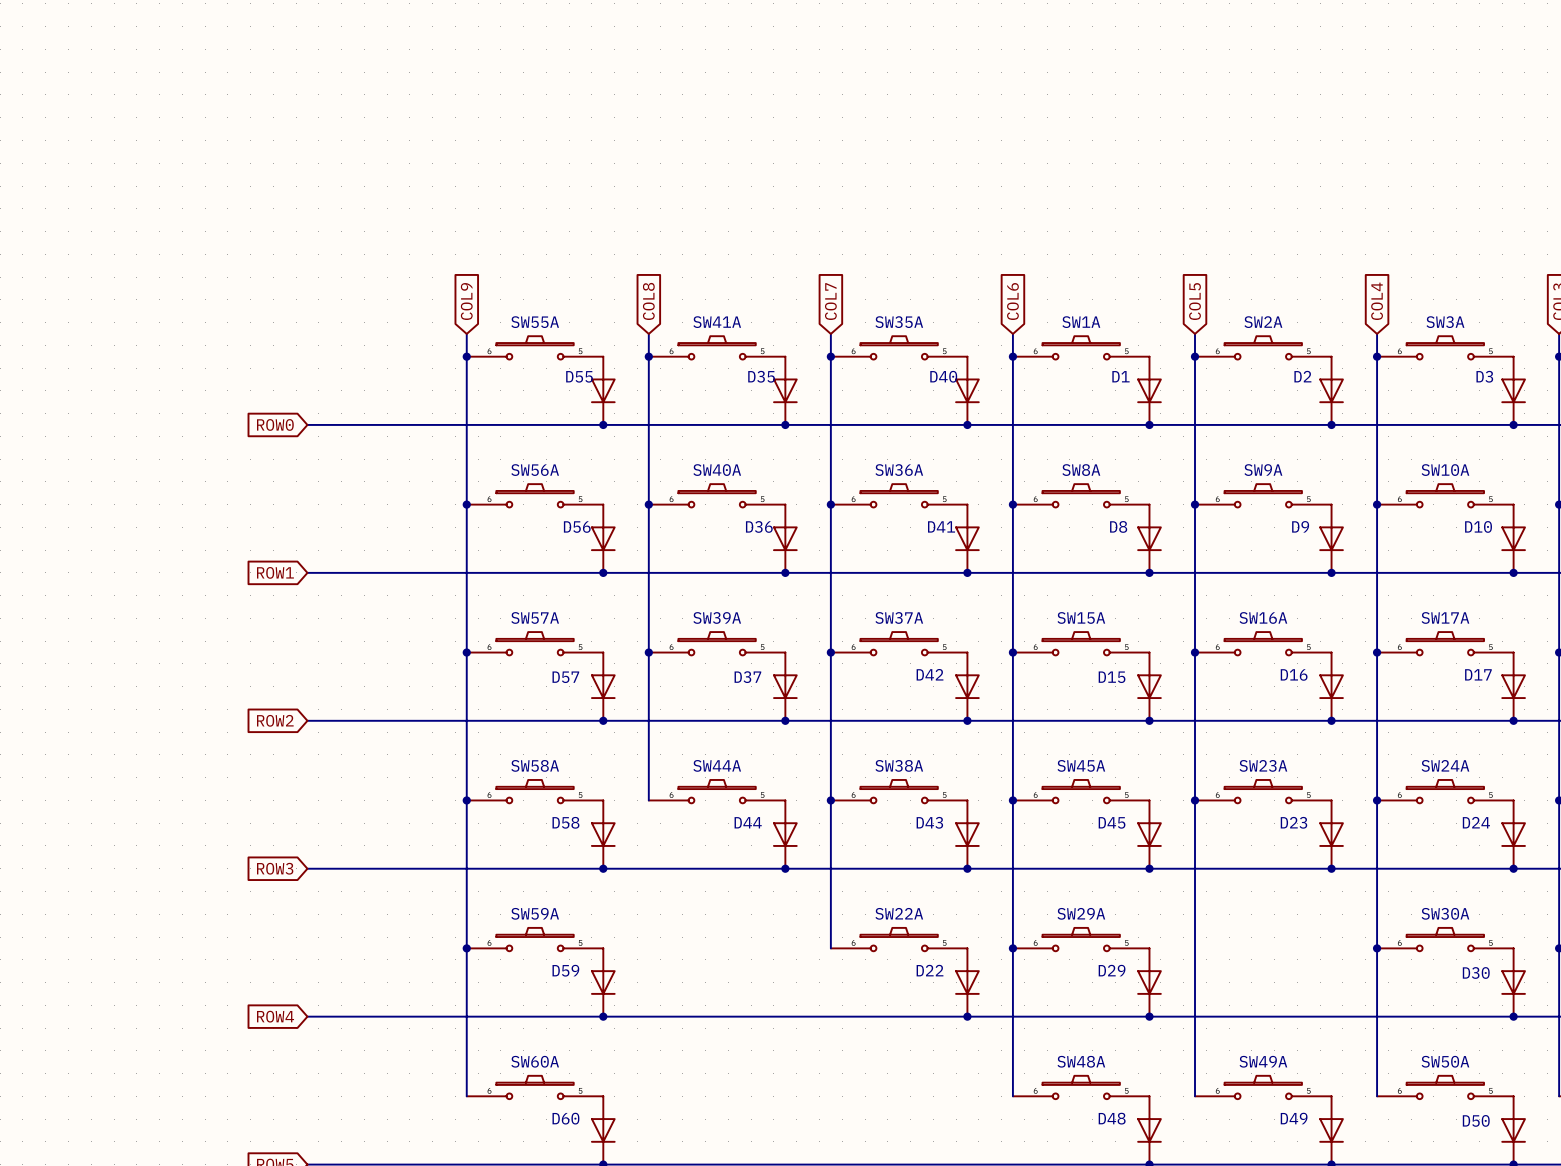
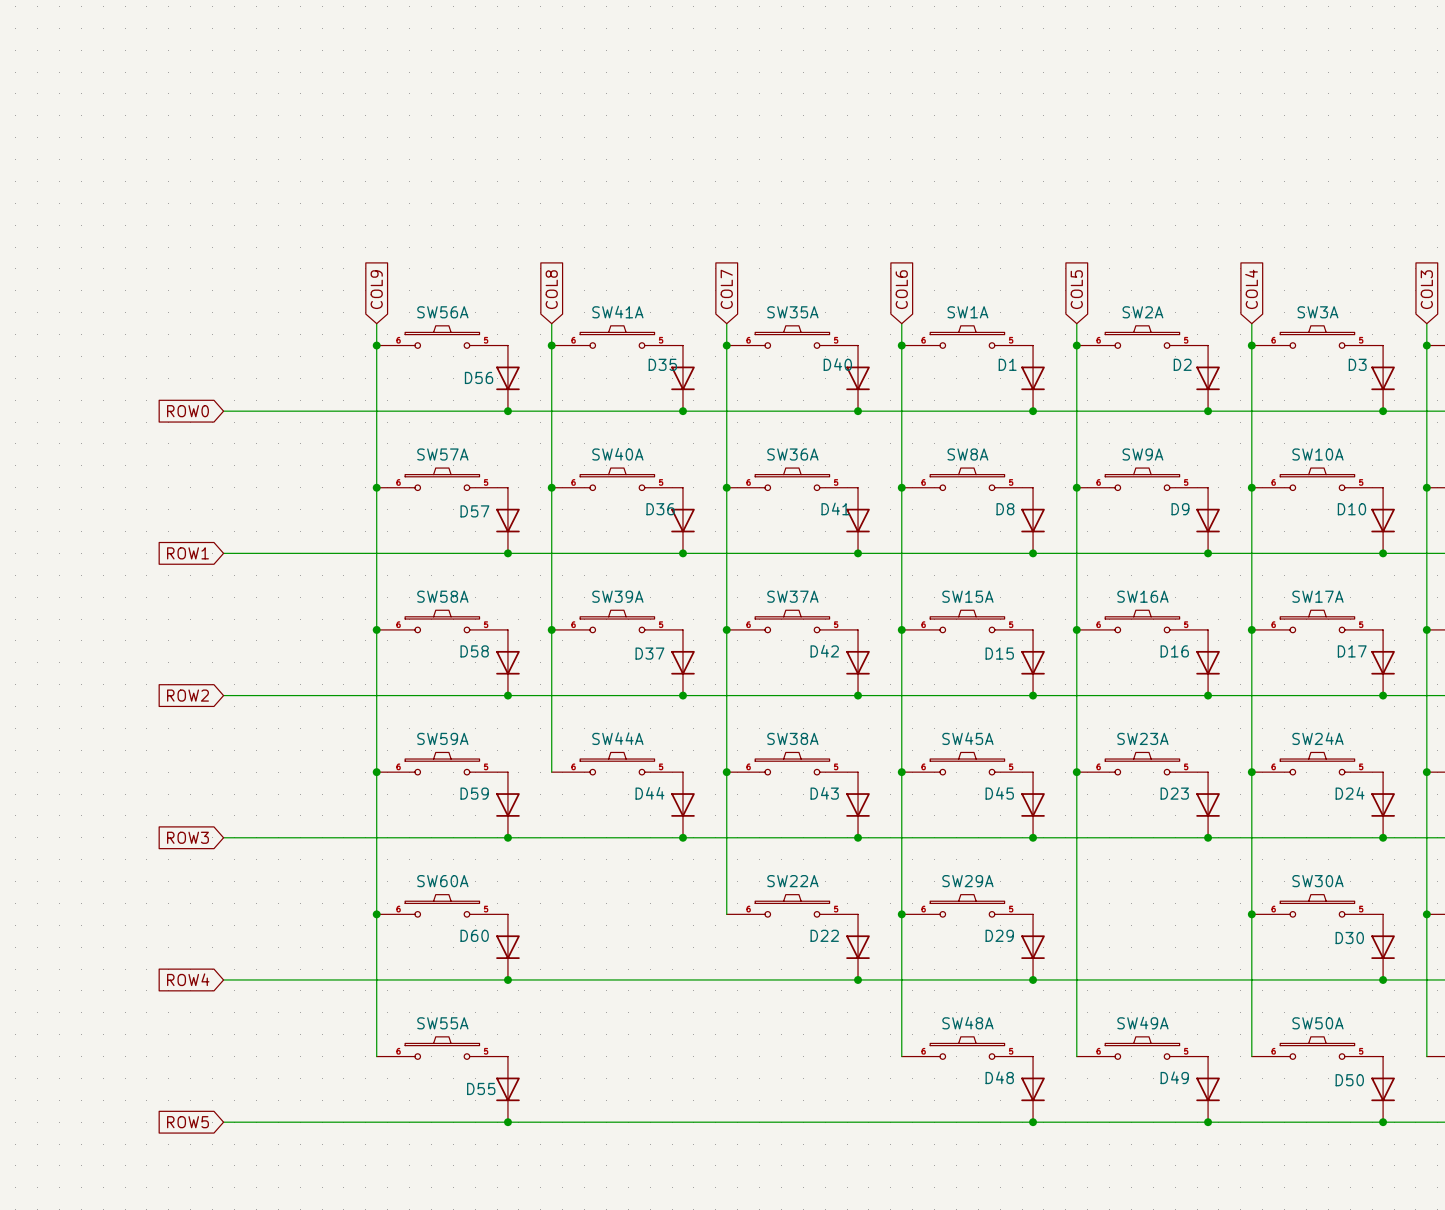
SW55A name: SW55A (535, 322) -> SW56A (442, 312)
D55 name: D55 (579, 376) -> D56 (479, 377)
SW56A name: SW56A (535, 470) -> SW57A (442, 454)
D56 name: D56 (577, 527) -> D57 (474, 511)
SW57A name: SW57A (535, 617) -> SW58A (442, 596)
D57 name: D57 (565, 677) -> D58 (474, 651)
SW58A name: SW58A (535, 765) -> SW59A (442, 738)
D58 name: D58 (565, 822) -> D59 (474, 793)
SW59A name: SW59A (535, 913) -> SW60A (442, 881)
D59 name: D59 (565, 970) -> D60 (474, 935)
SW60A name: SW60A (535, 1061) -> SW55A (442, 1023)
D60 name: D60 (565, 1118) -> D55 (481, 1088)

